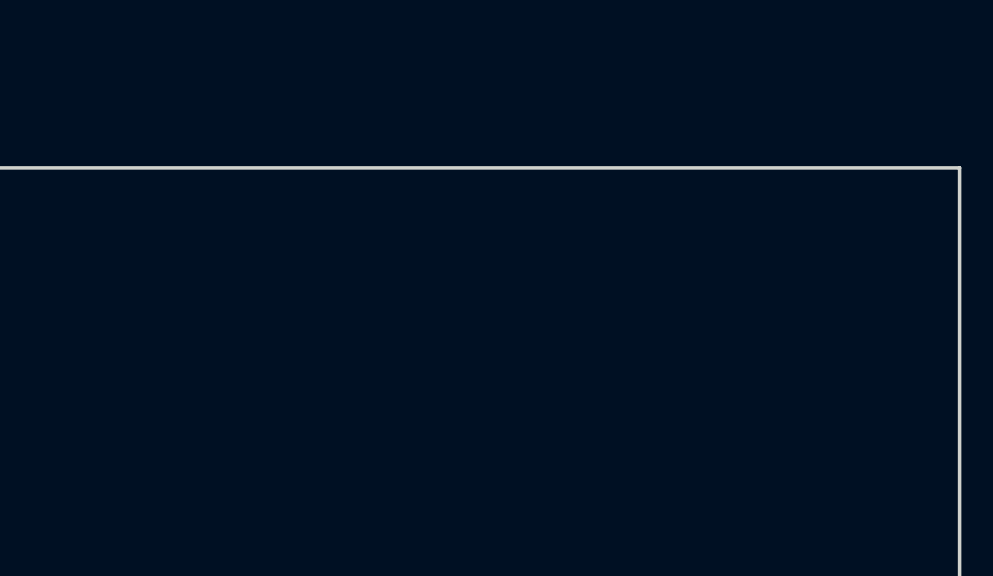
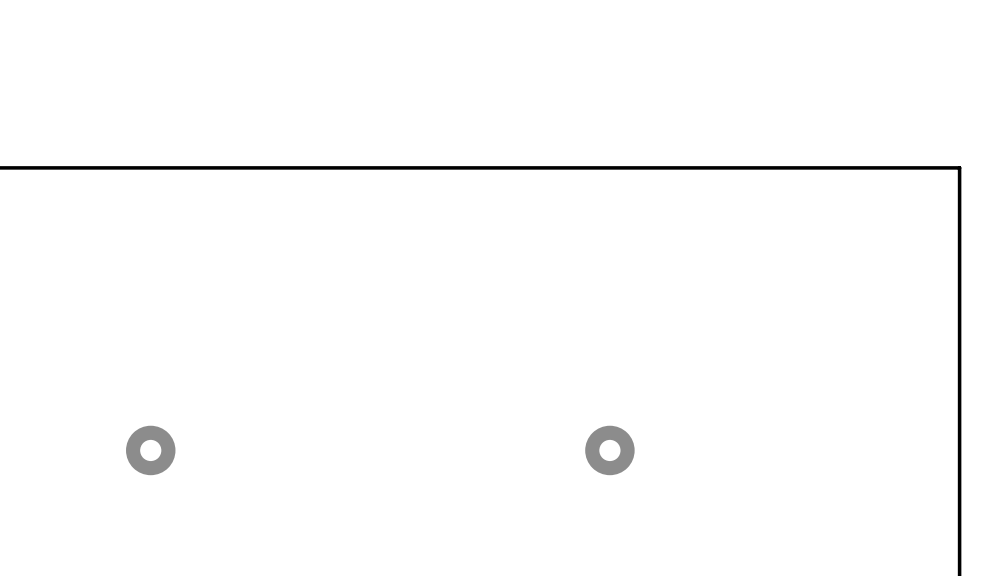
via: none -> (150, 450)
via: none -> (609, 450)

